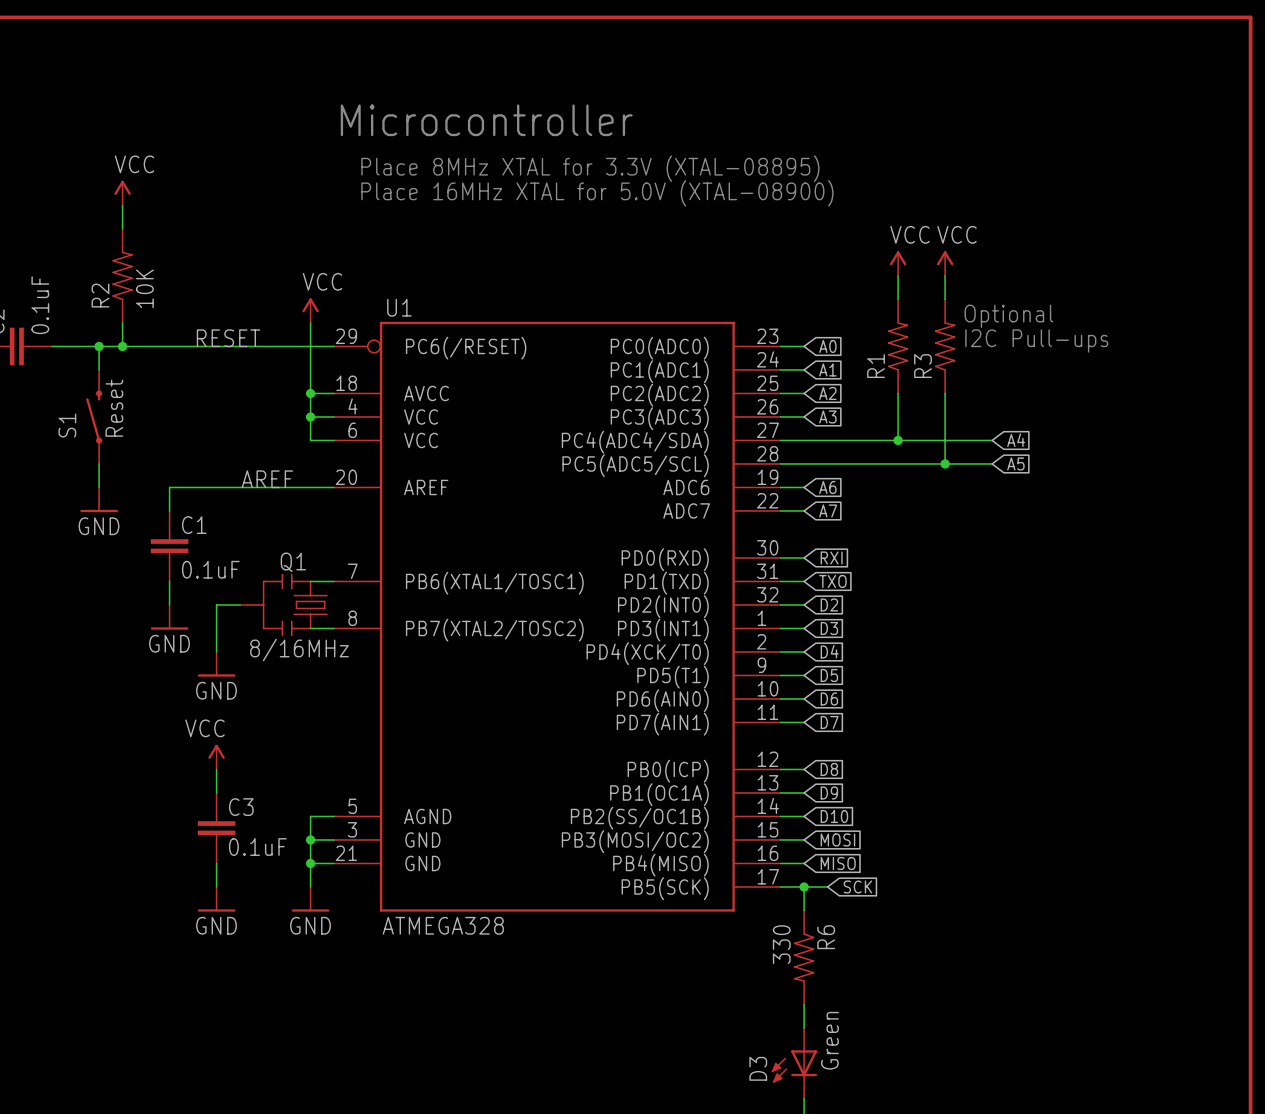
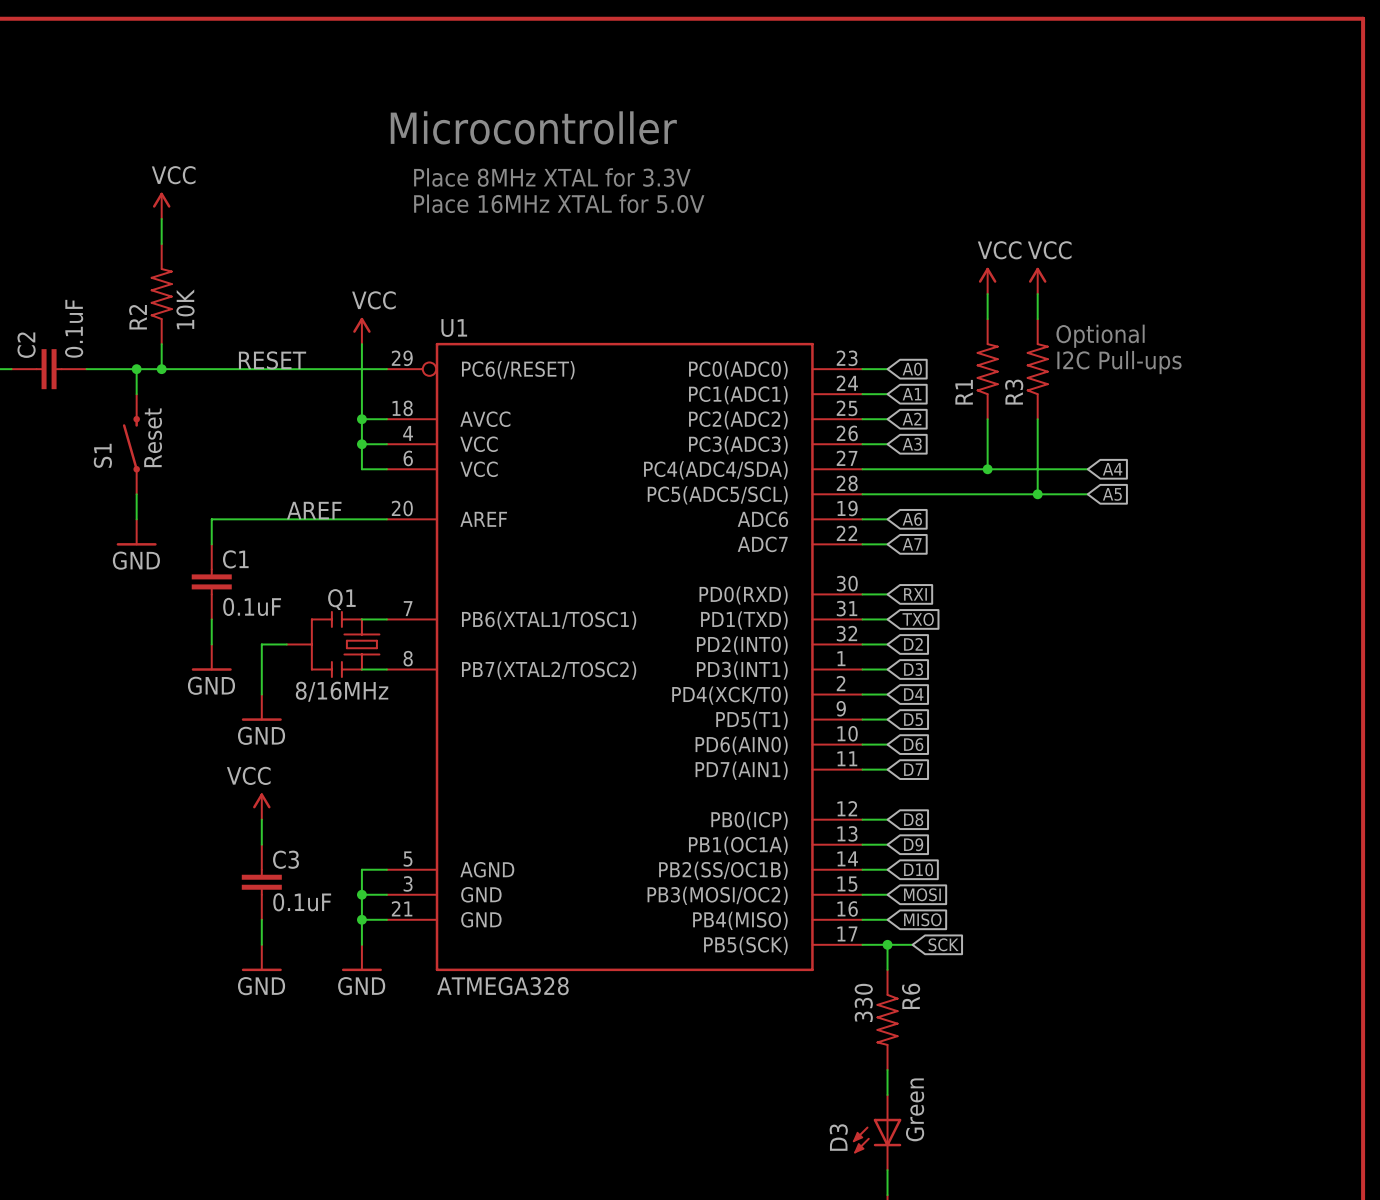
text: Place 8MHz XTAL for 3.3V (XTAL-08895) (590, 168) -> Place 8MHz XTAL for 3.3V (552, 177)
text: Place 16MHz XTAL for 5.0V (XTAL-08900) (597, 193) -> Place 16MHz XTAL for 5.0V (559, 203)

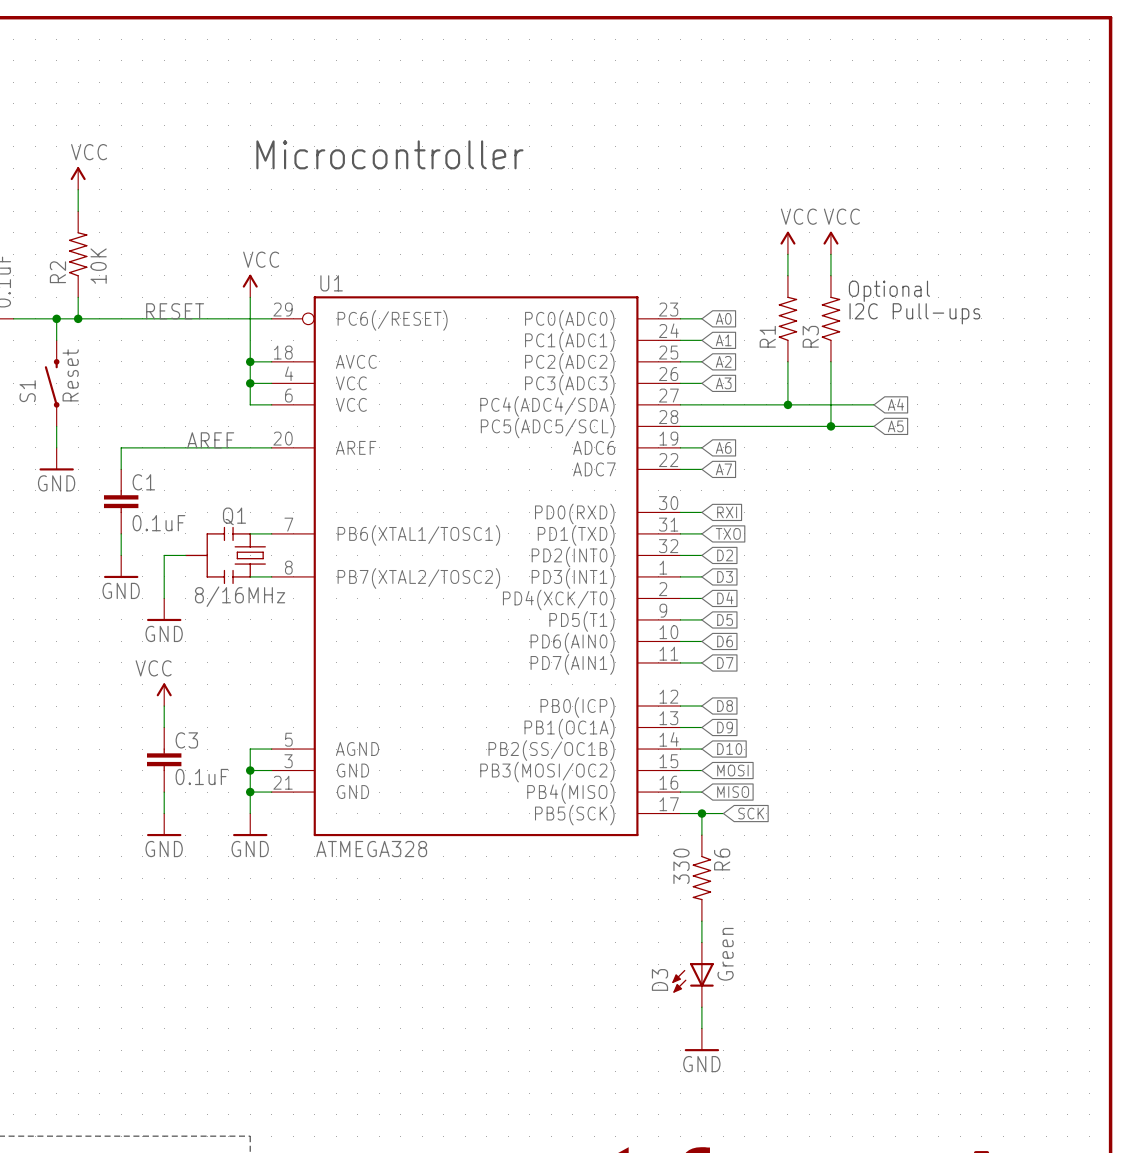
text position: Microcontroller (533, 127) -> Microcontroller (389, 154)
text: Place 8MHz XTAL for 3.3V (552, 177) -> none
text: Place 16MHz XTAL for 5.0V (559, 203) -> none

